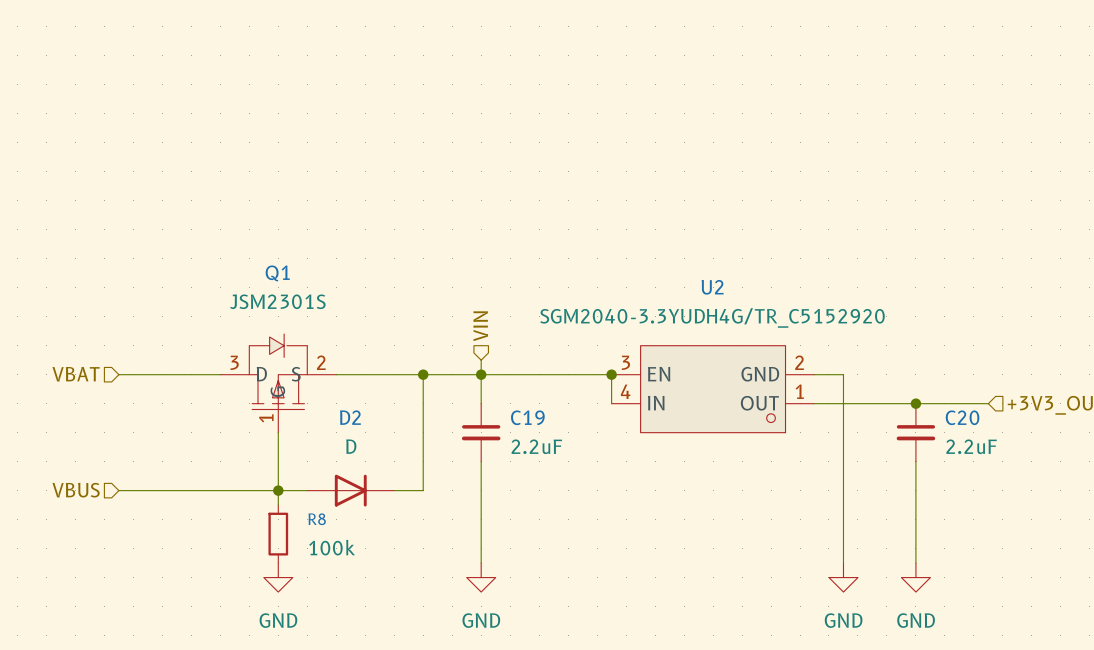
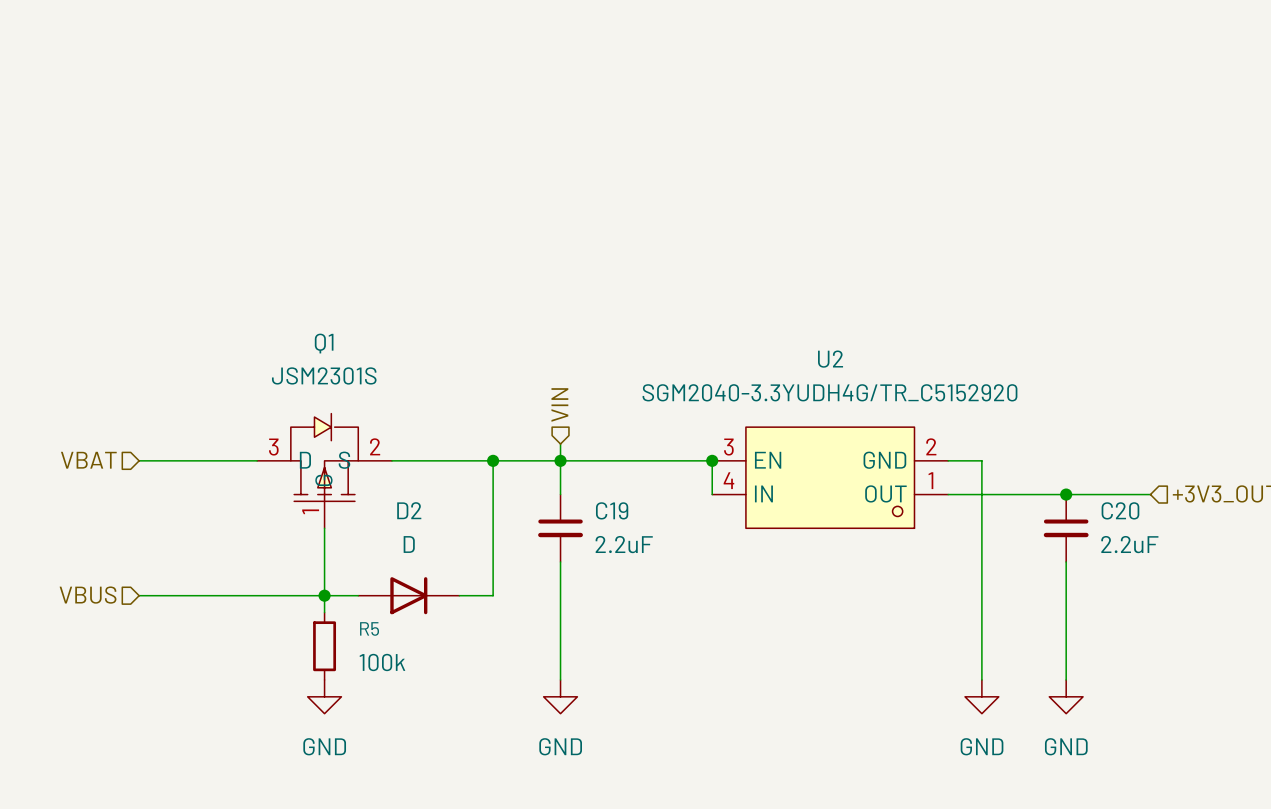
R8 name: R8 (317, 519) -> R5 (369, 628)

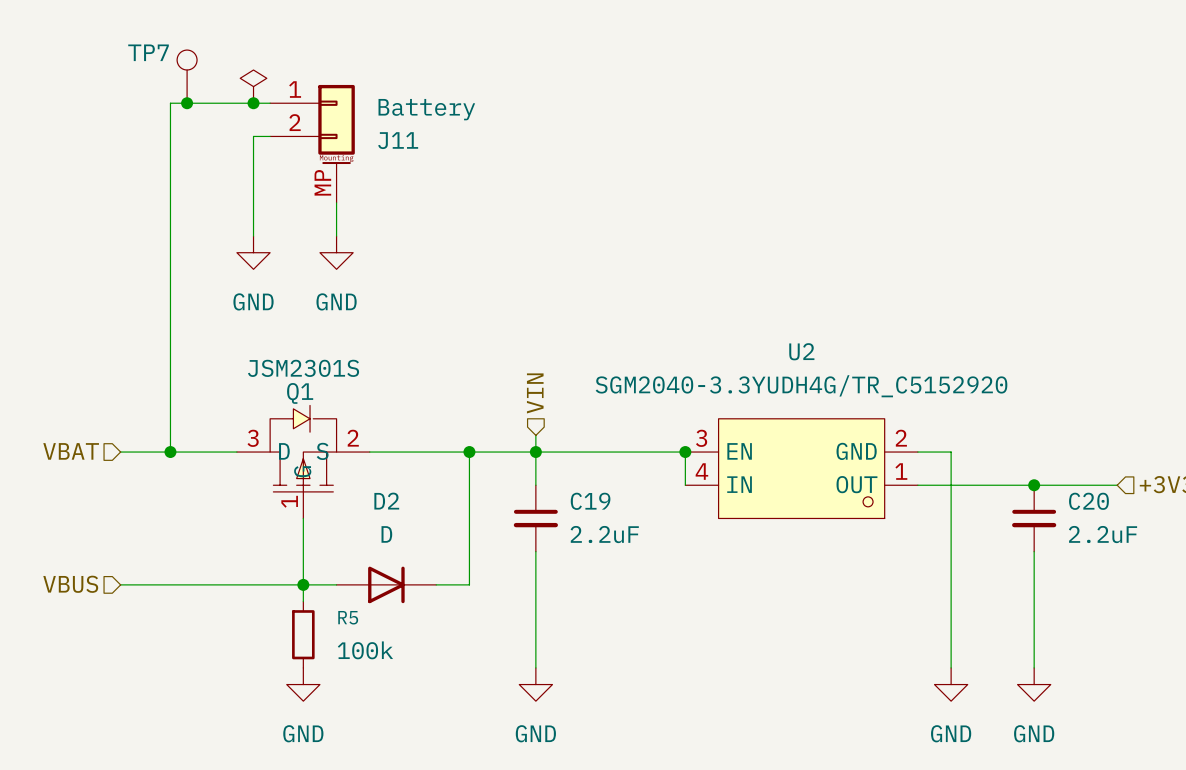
TP7: none -> (187, 76)
power symbol: none -> (253, 86)
junction: none -> (187, 103)
junction: none -> (253, 103)
wire: none -> (270, 103) (170, 103) (170, 452)
wire: none -> (270, 136) (253, 136) (253, 236)
J11: none -> Battery (312, 143)
wire: none -> (336, 202) (336, 236)
power symbol: none -> GND (253, 252)
power symbol: none -> GND (336, 252)
Q1 name position: Q1 (324, 343) -> Q1 (300, 393)
junction: none -> (170, 452)

